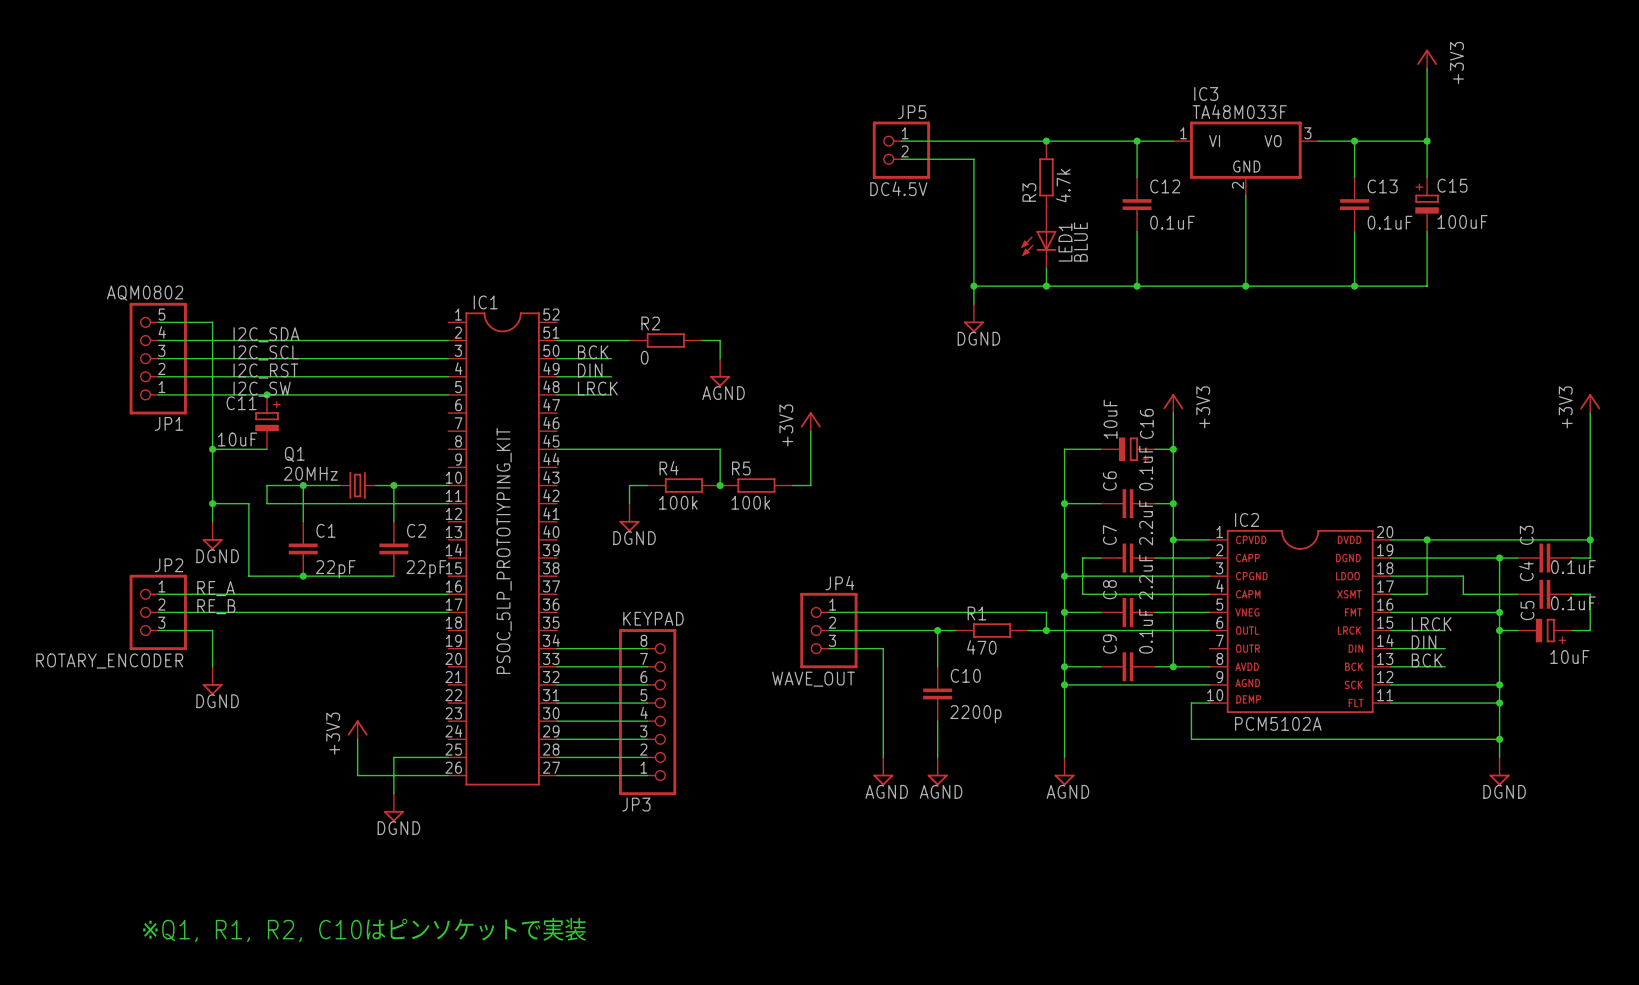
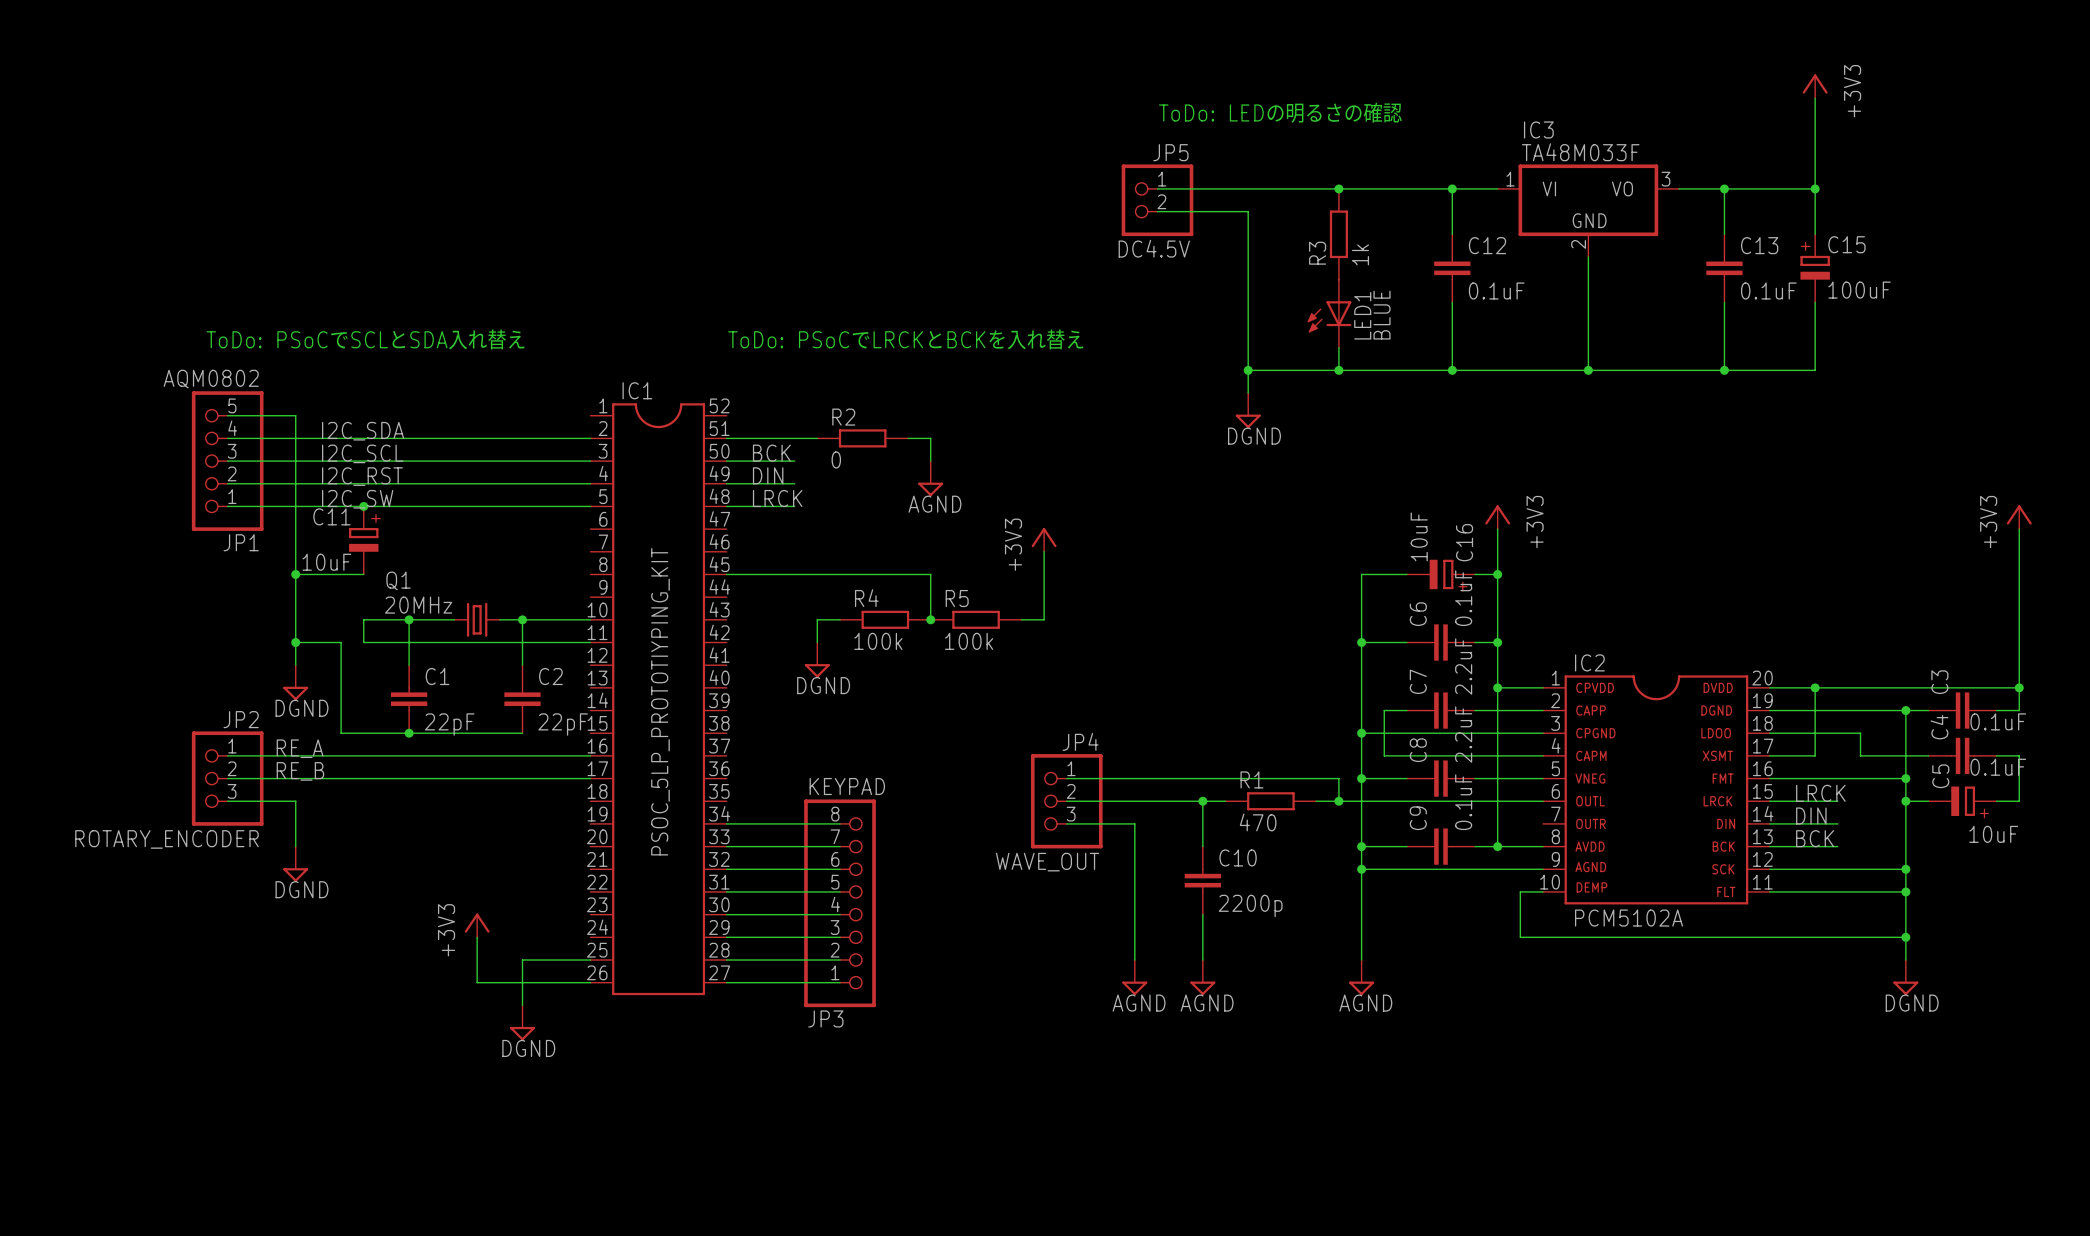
text: none -> ToDo: LEDの明るさの確認 (1280, 112)
R3 value: 4.7k (1063, 185) -> 1k (1360, 254)
text: none -> ToDo: PSoCでSCLとSDA入れ替え (365, 339)
text: none -> ToDo: PSoCでLRCKとBCKを入れ替え (906, 339)
text: ※Q1, R1, R2, C10はピンソケットで実装 (364, 929) -> none

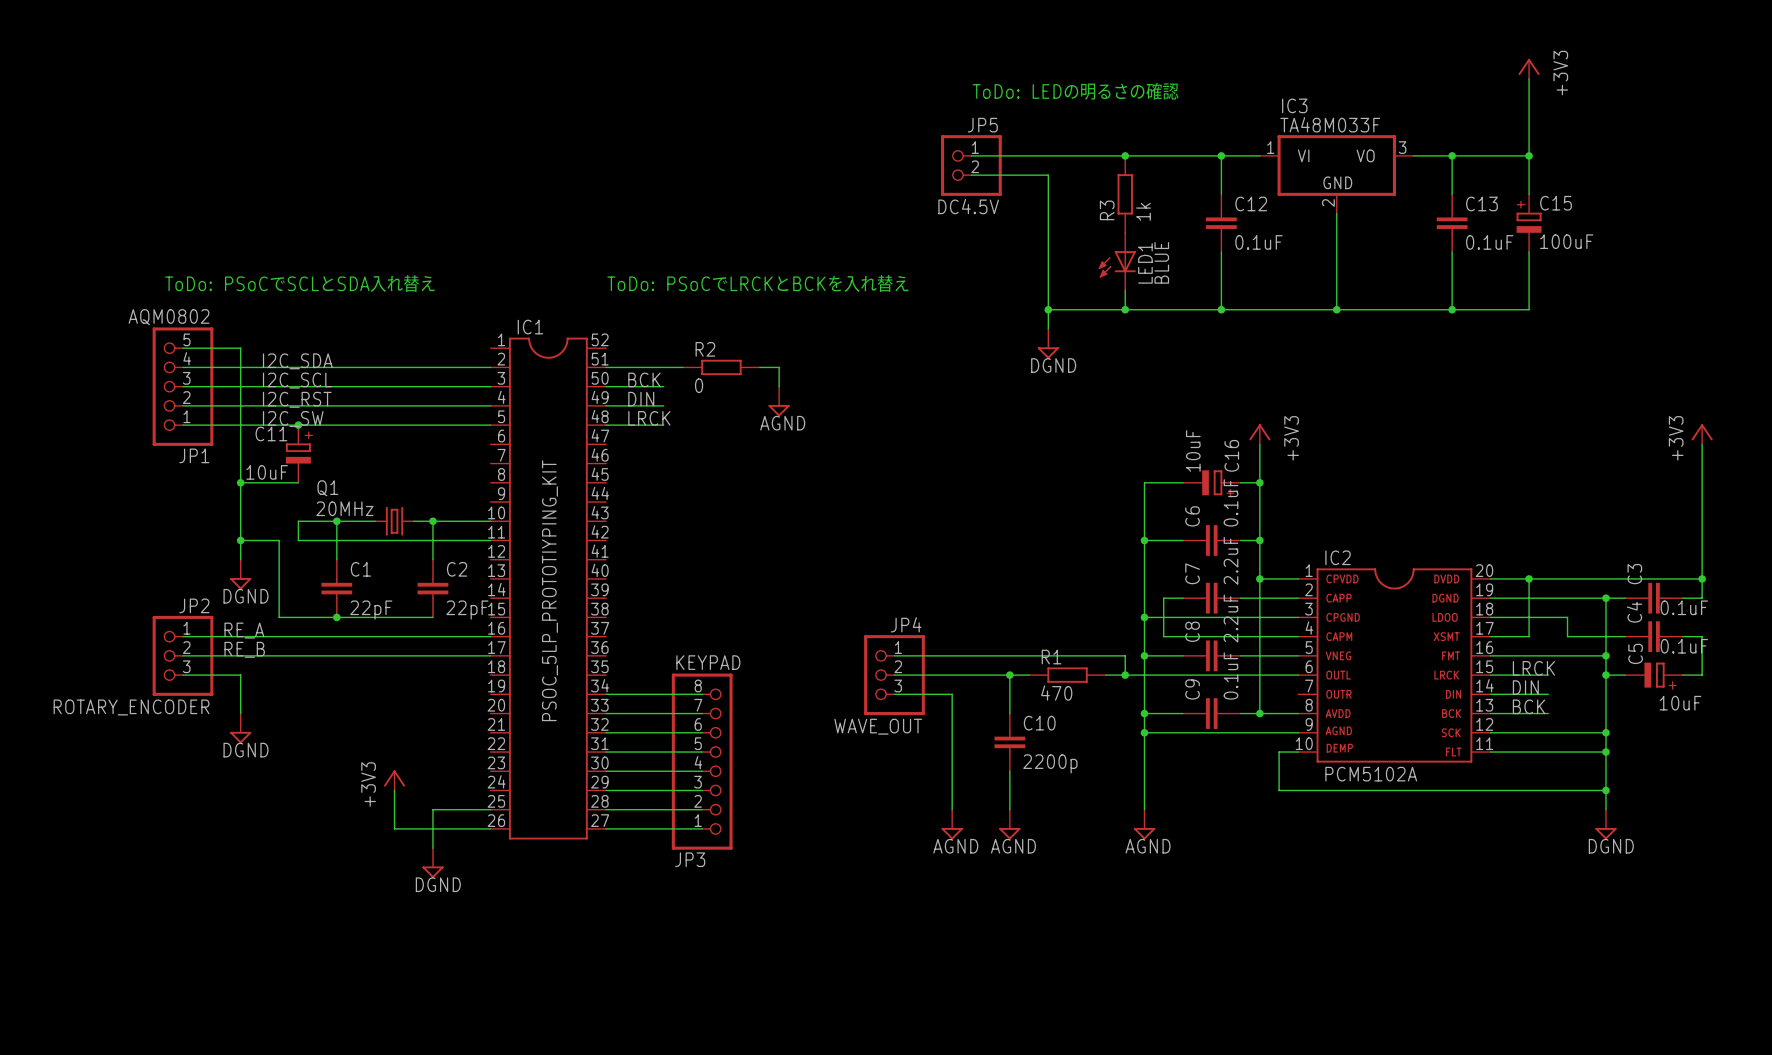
power symbol: +3V3 (1044, 539) -> none
wire: (1044, 551) (1044, 619) (1021, 619) -> none
wire: (726, 574) (930, 574) (930, 619) -> none
wire: (840, 619) (817, 619) (817, 642) -> none
R4: 100k (885, 619) -> none
junction: (930, 619) -> none
R5: 100k (976, 619) -> none
power symbol: DGND (817, 660) -> none

